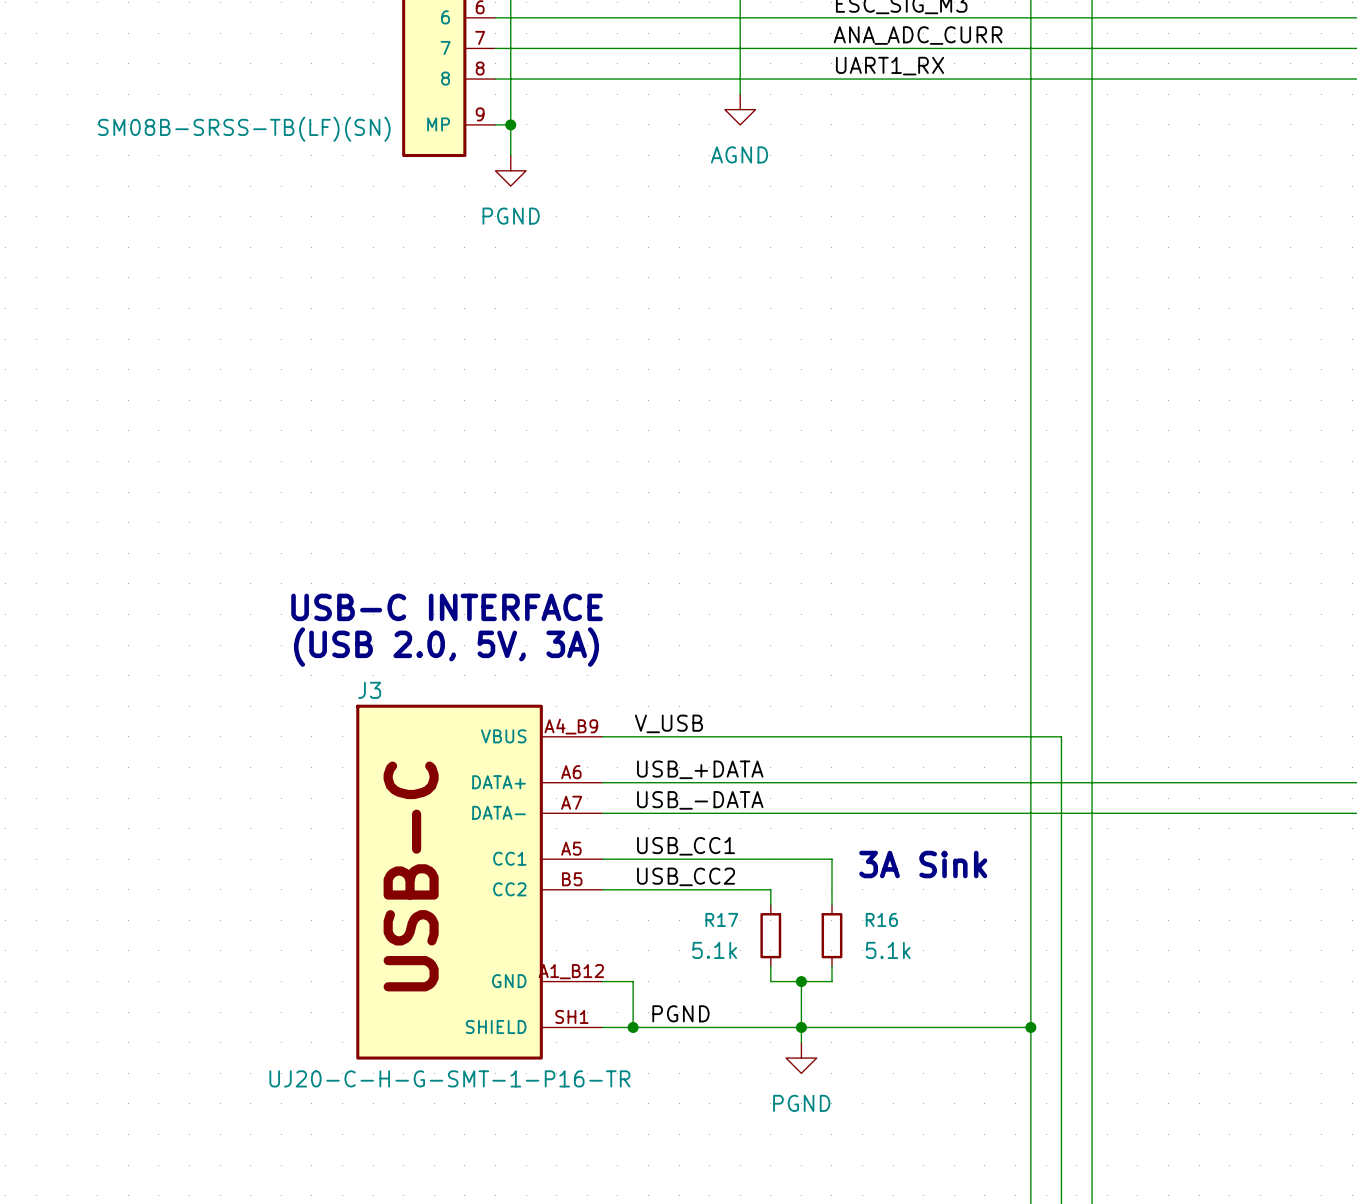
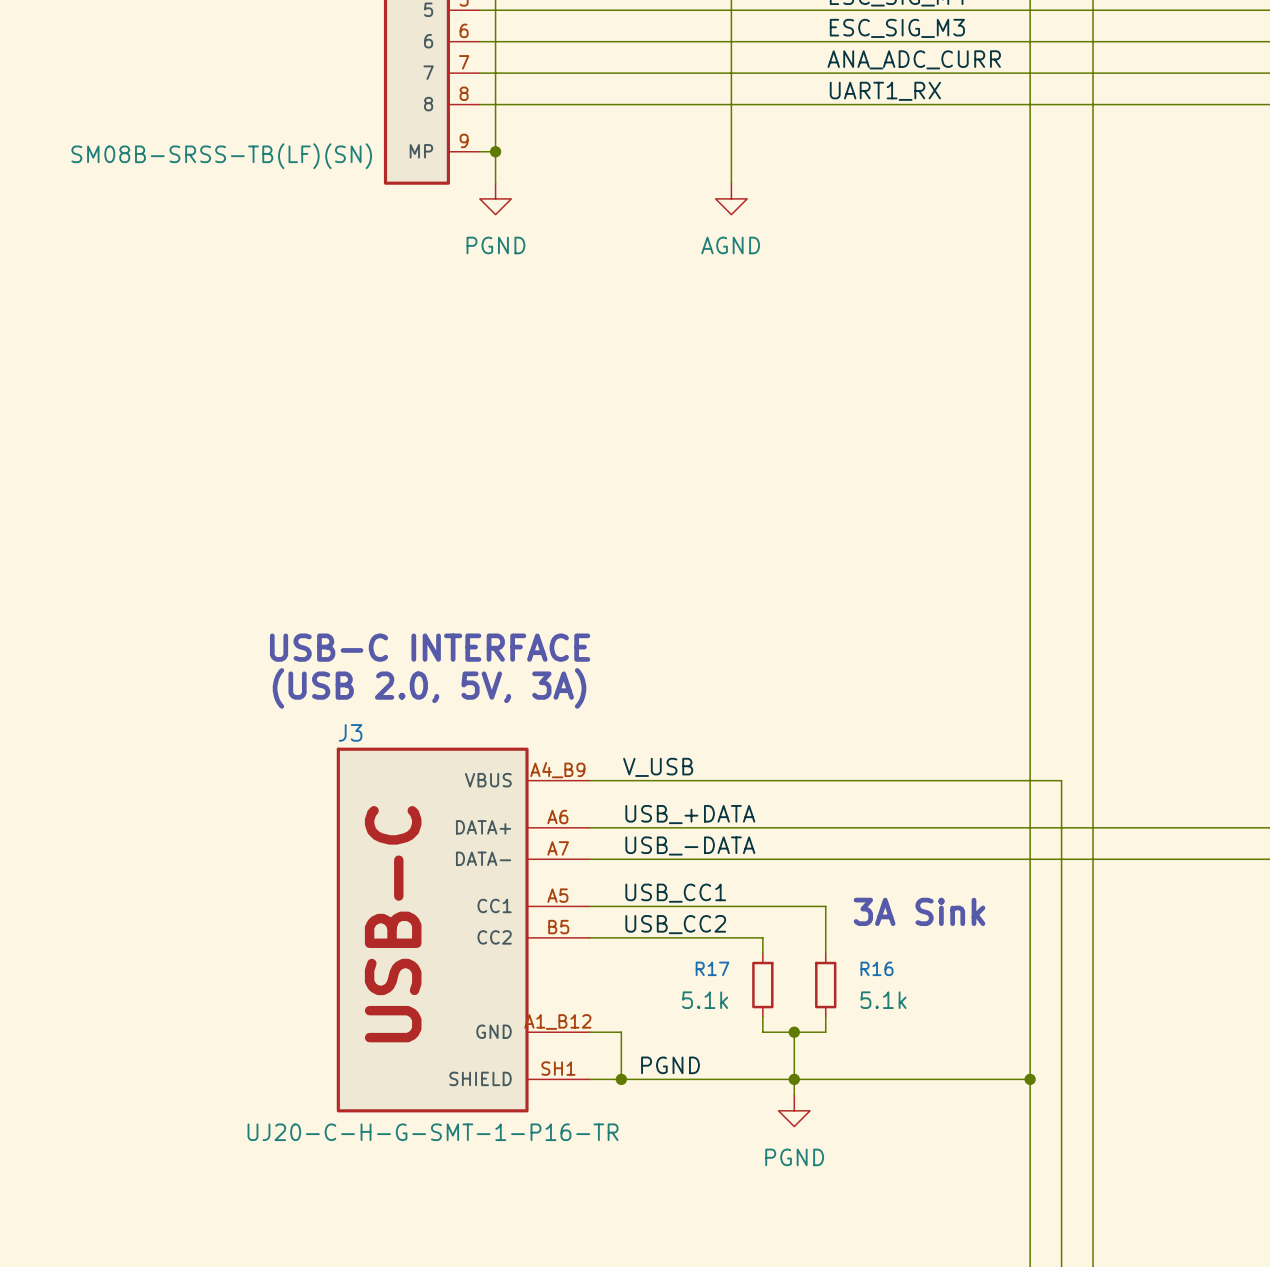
wire: none -> (731, 120) (731, 183)
power symbol position: AGND (740, 109) -> AGND (731, 198)

